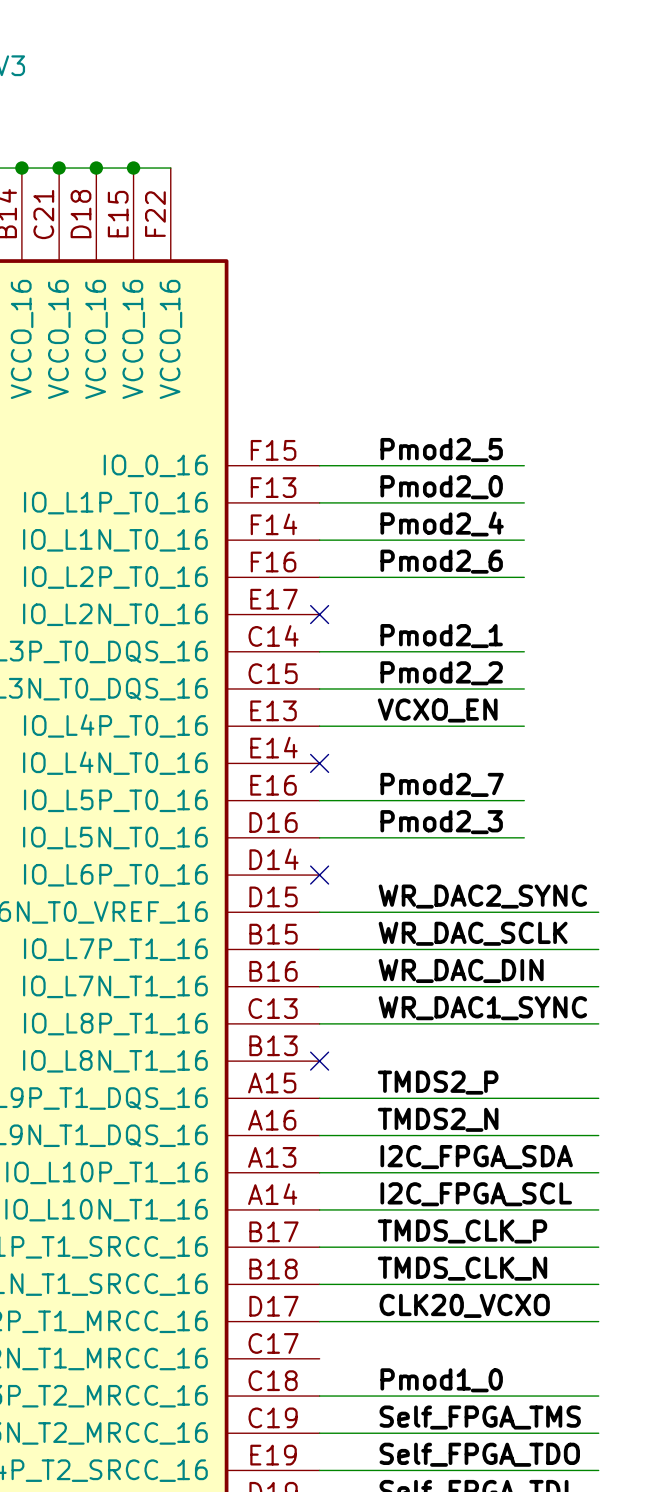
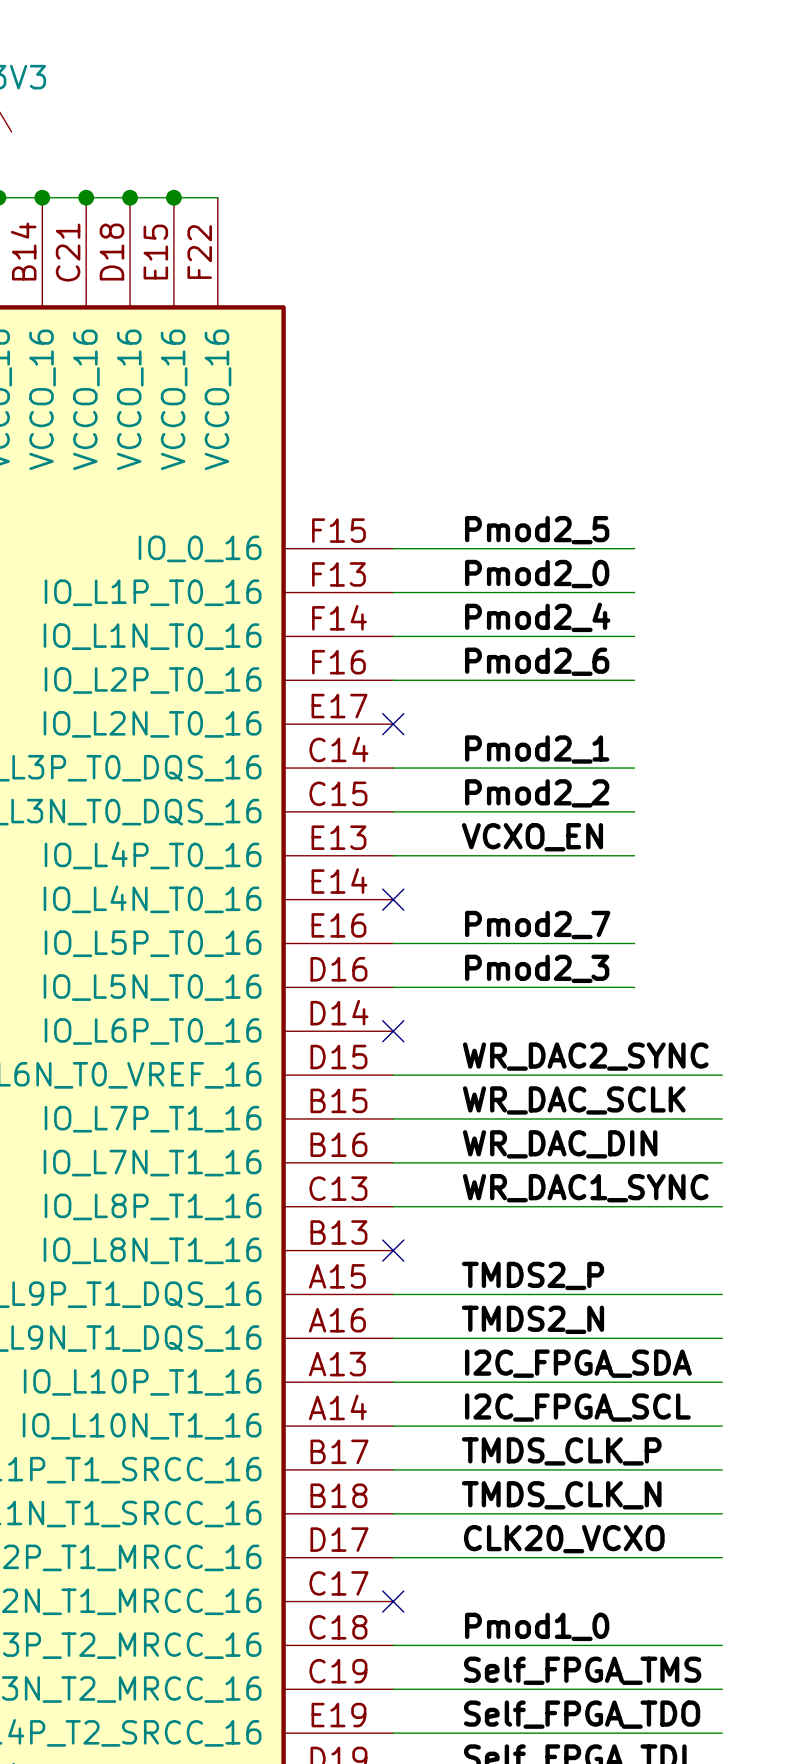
no-connect mark: none -> (393, 1601)

